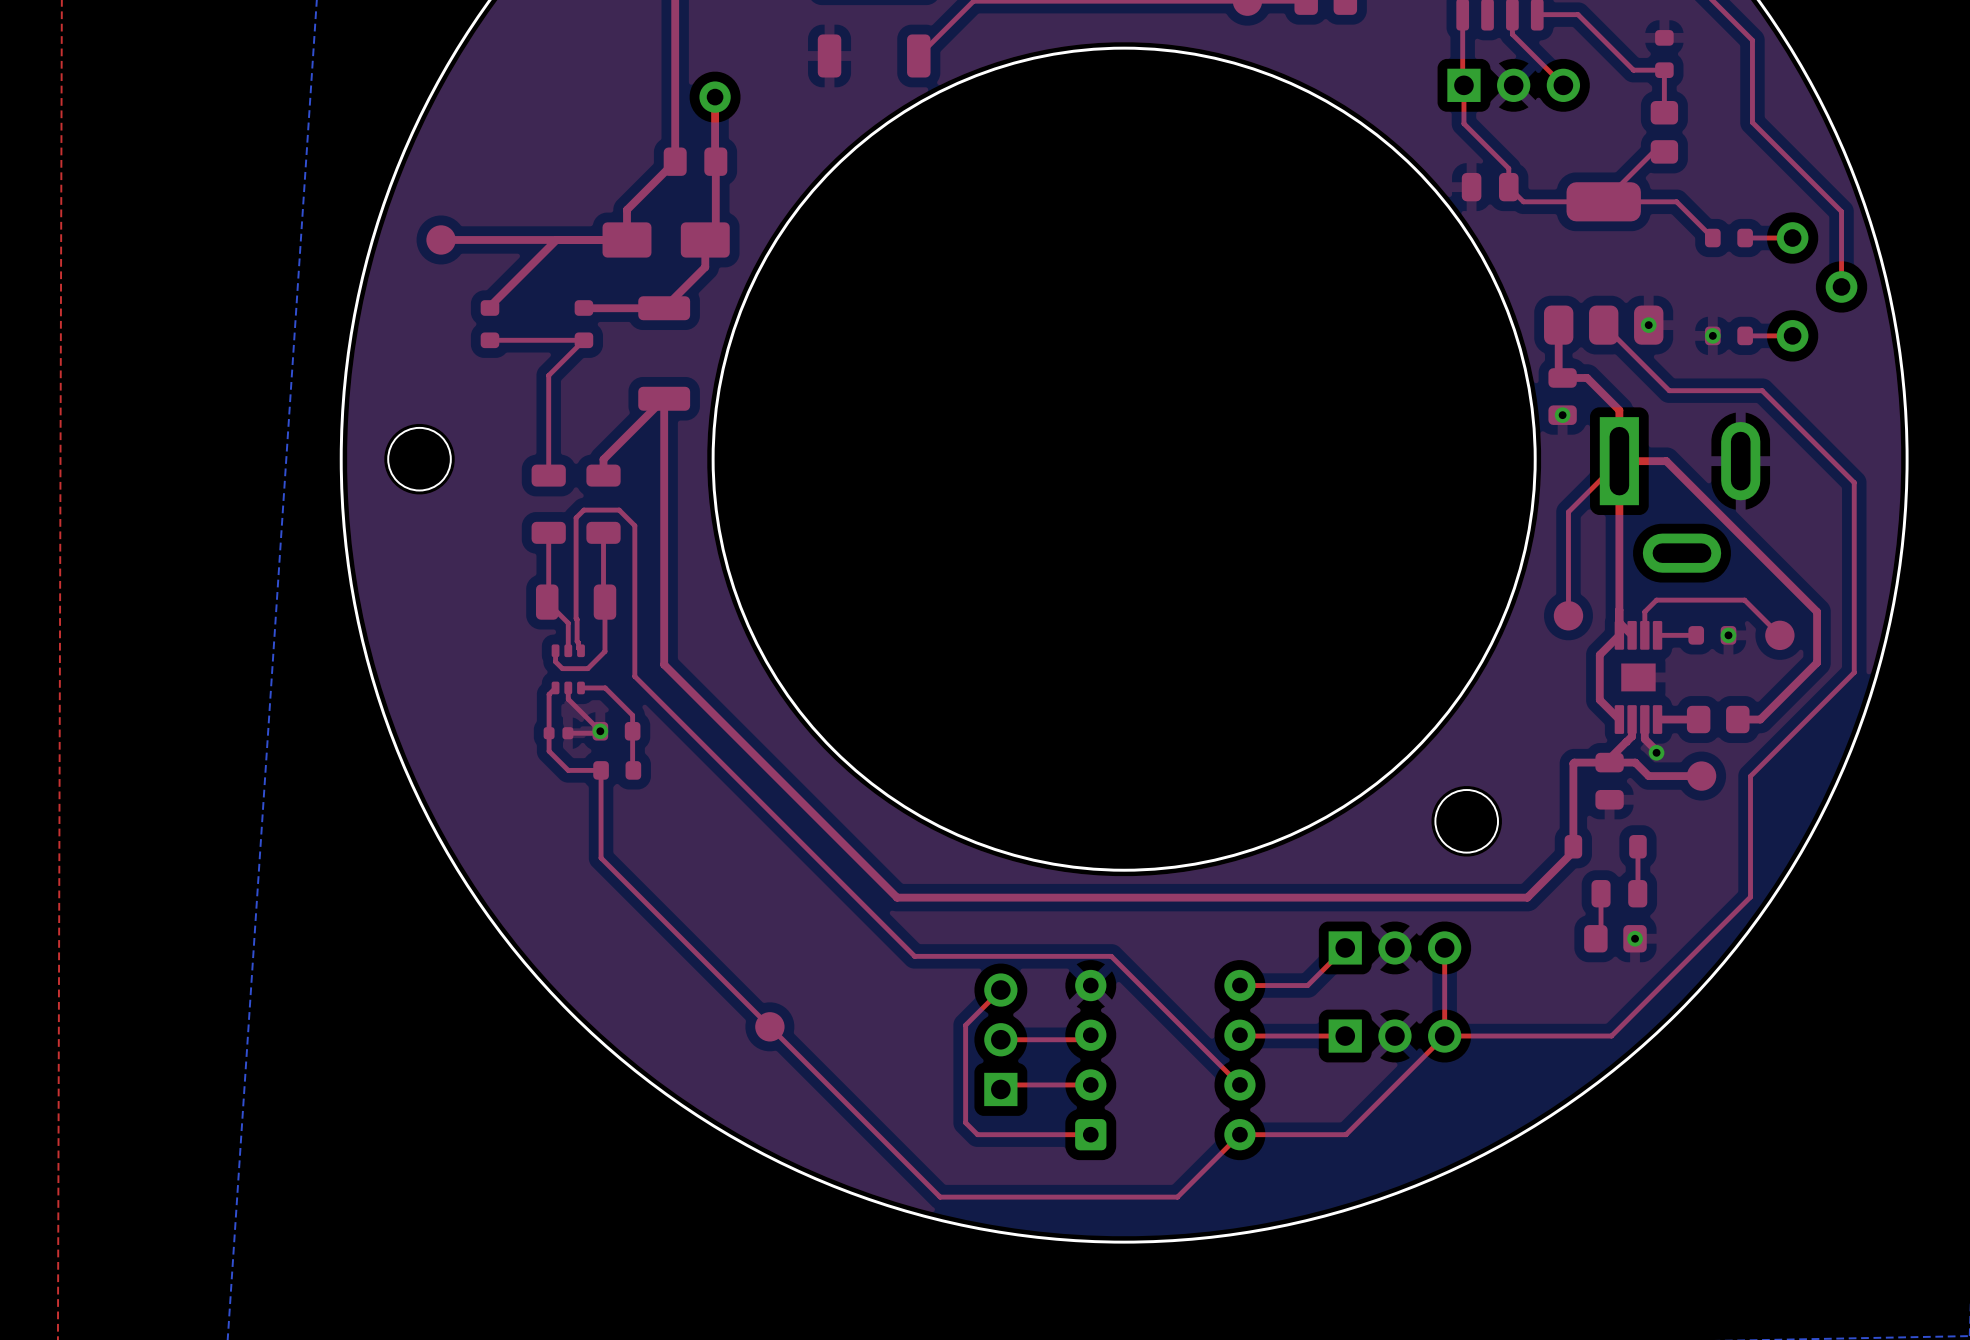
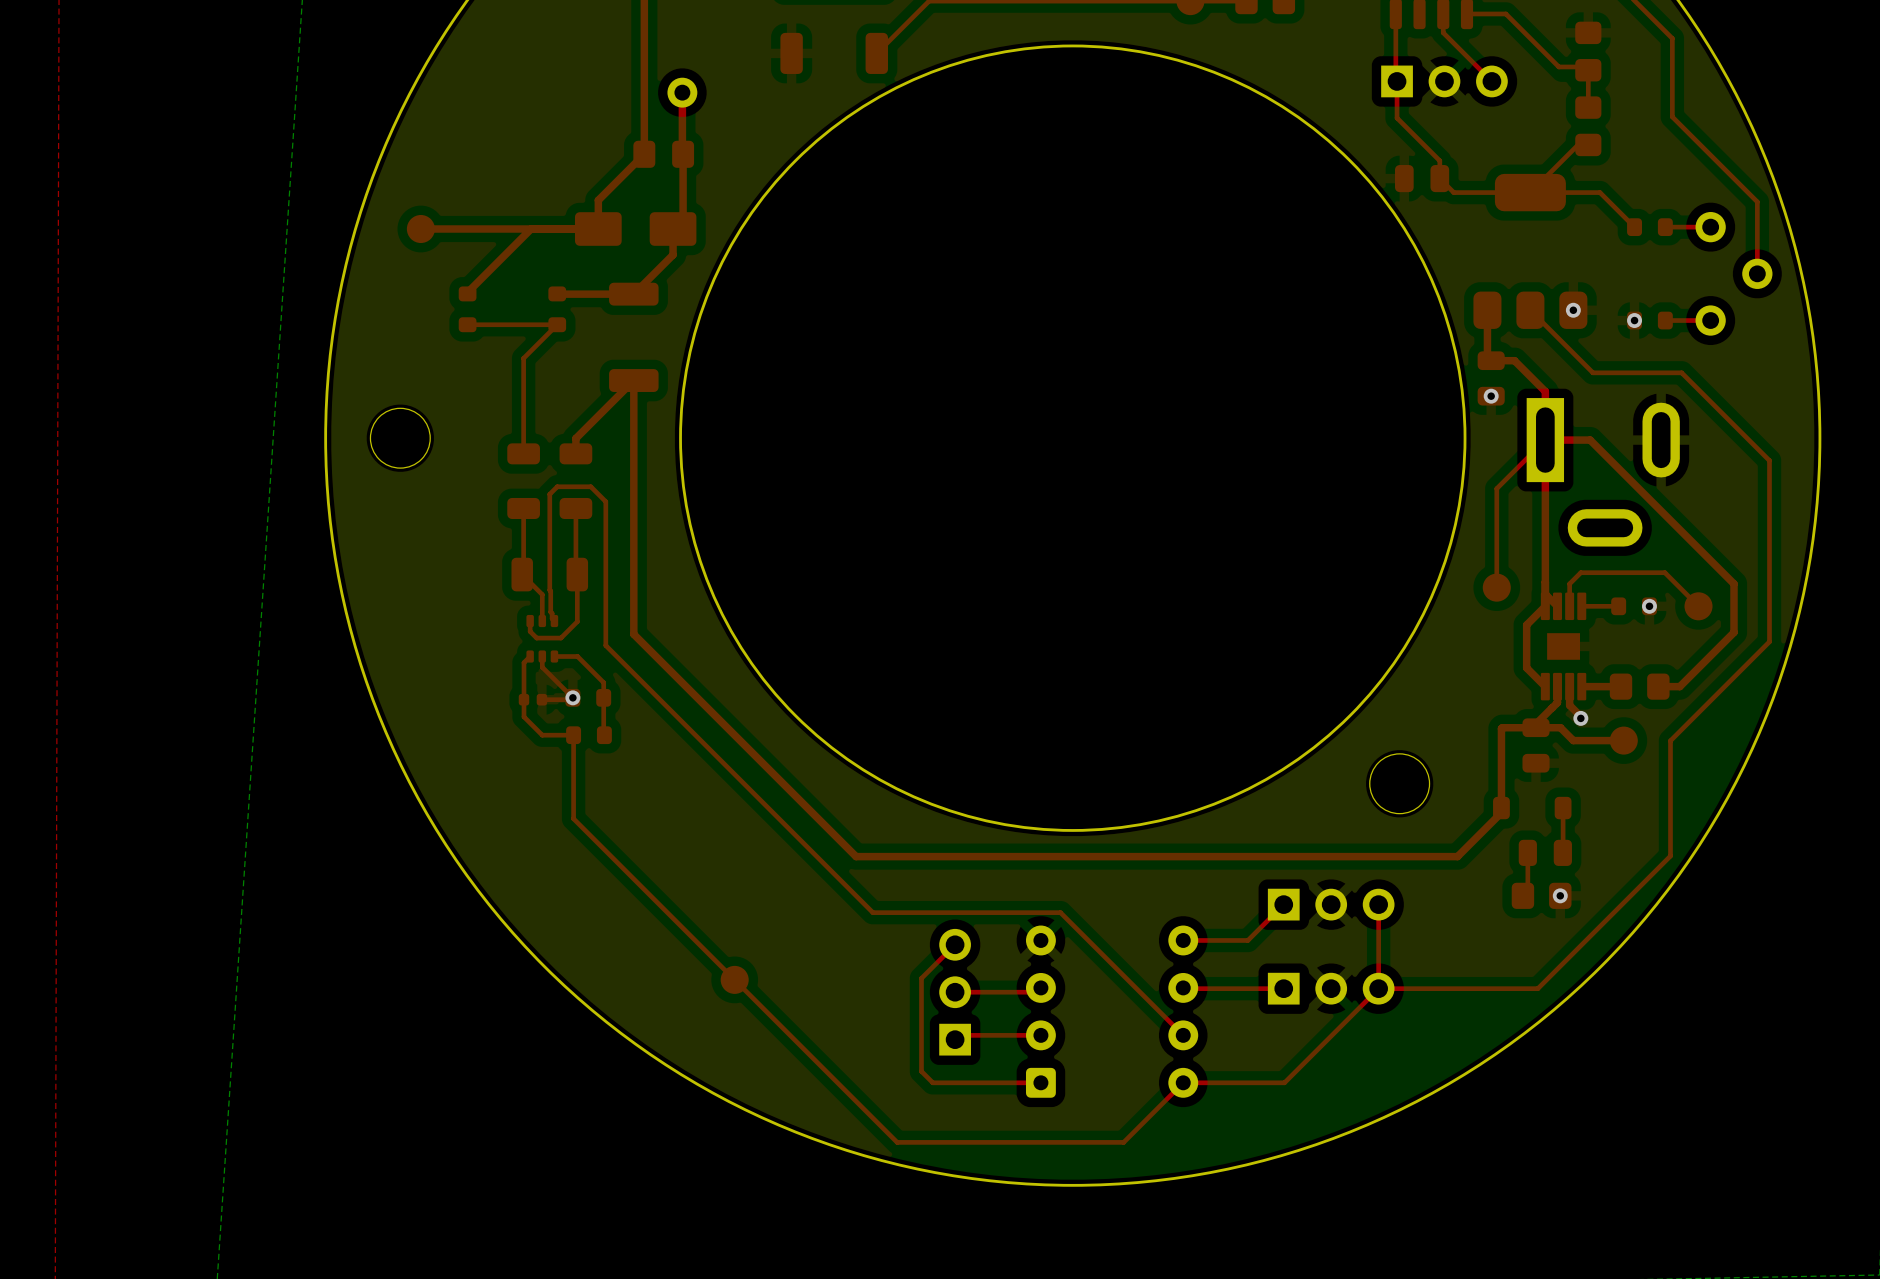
part footprint: [1655, 30, 1674, 79] -> [1575, 21, 1602, 82]

